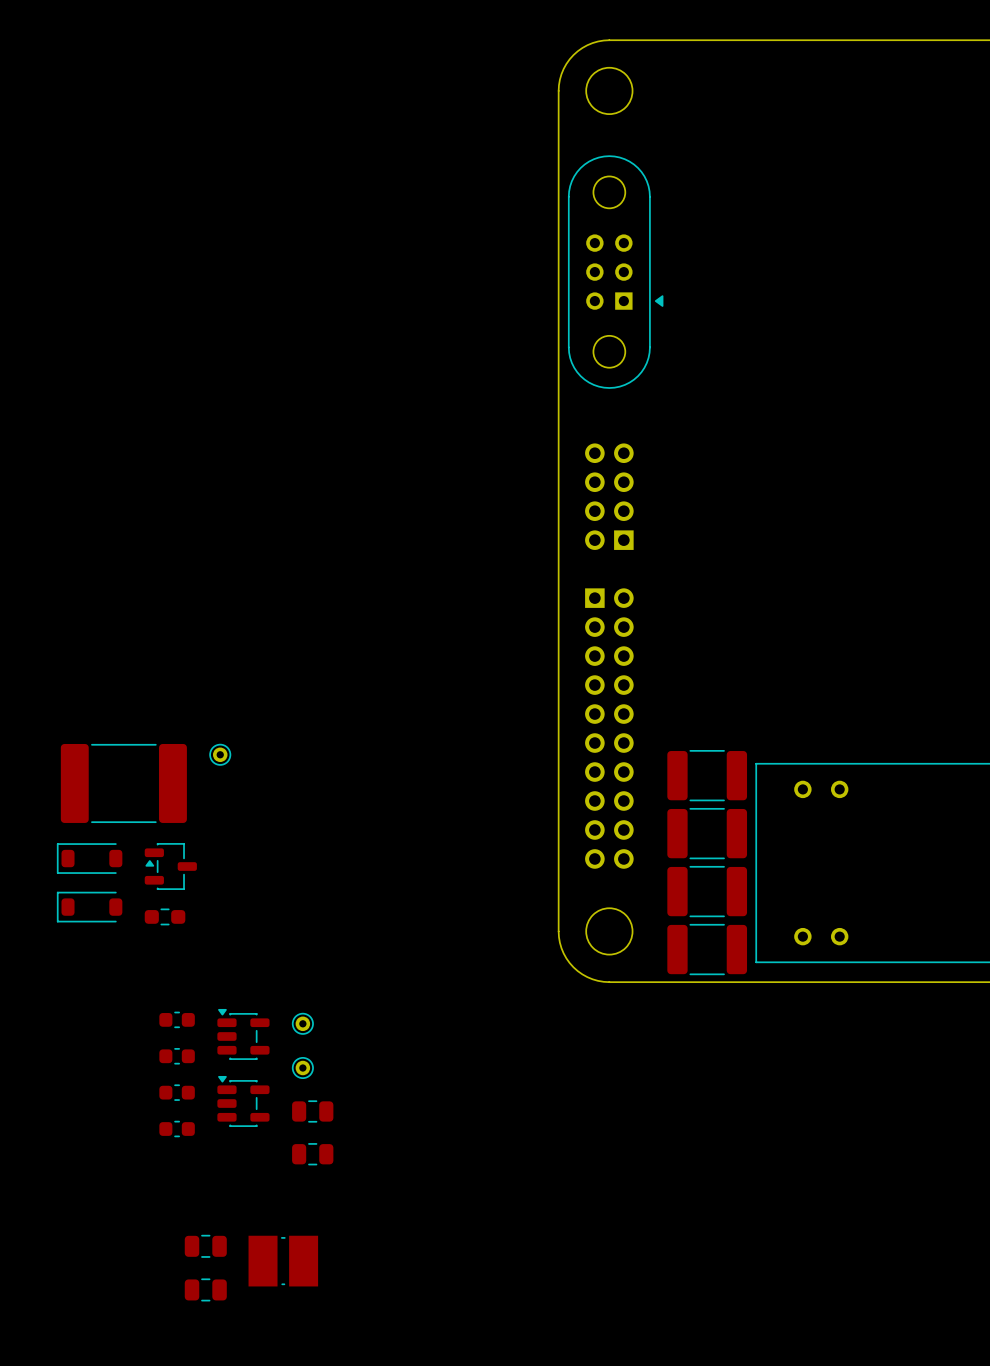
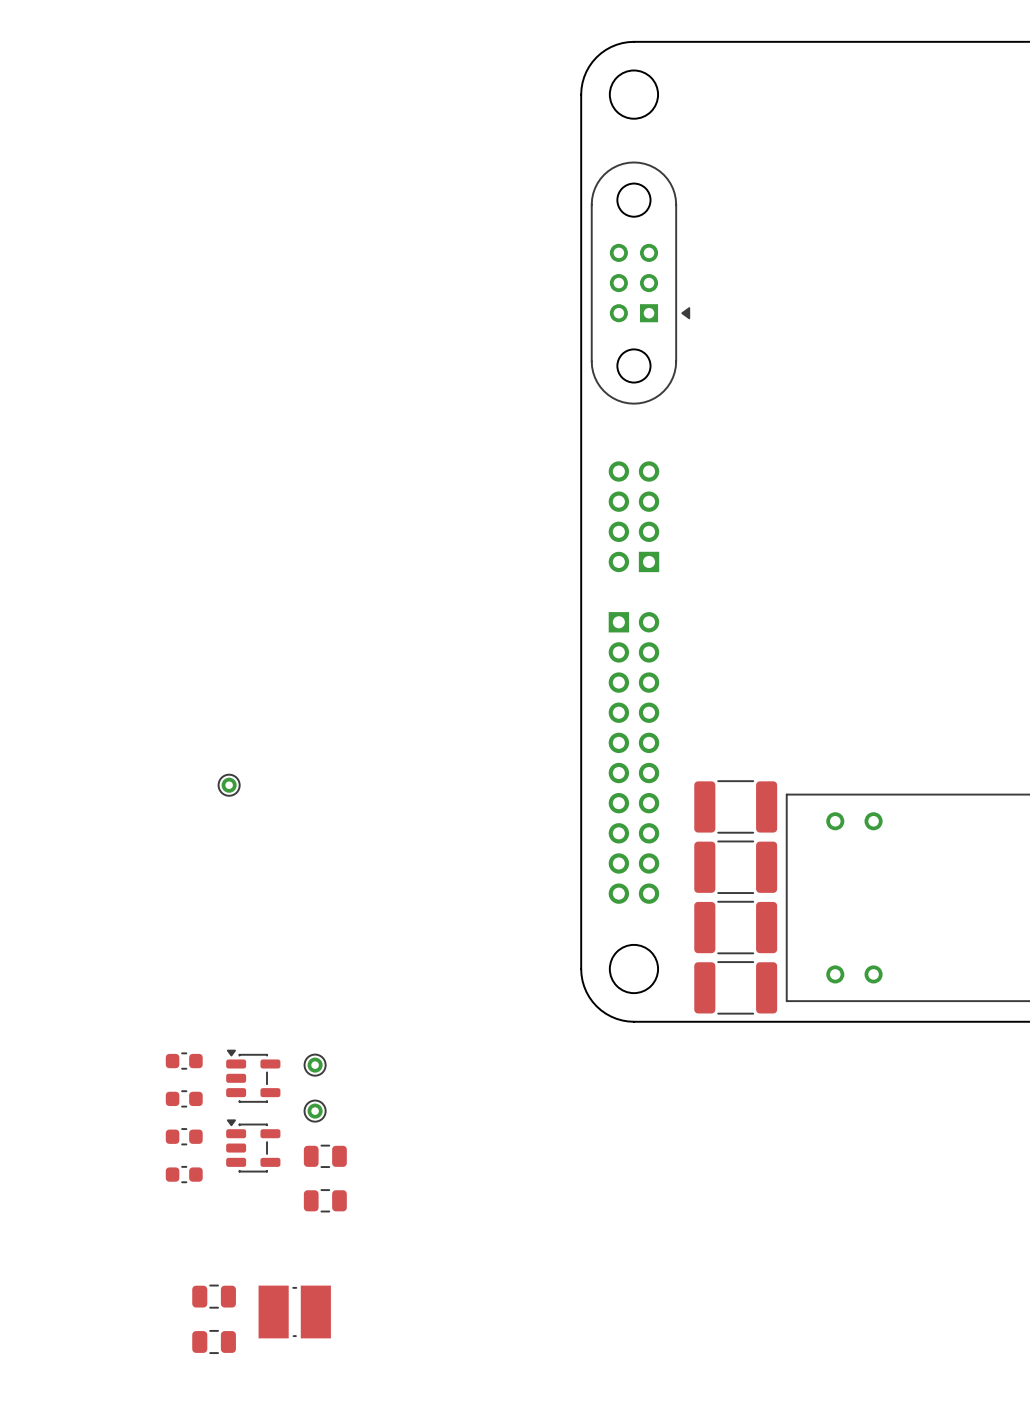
part: (123, 783) -> none
part: (89, 858) -> none
part: (170, 866) -> none
part: (89, 907) -> none
part: (165, 916) -> none

